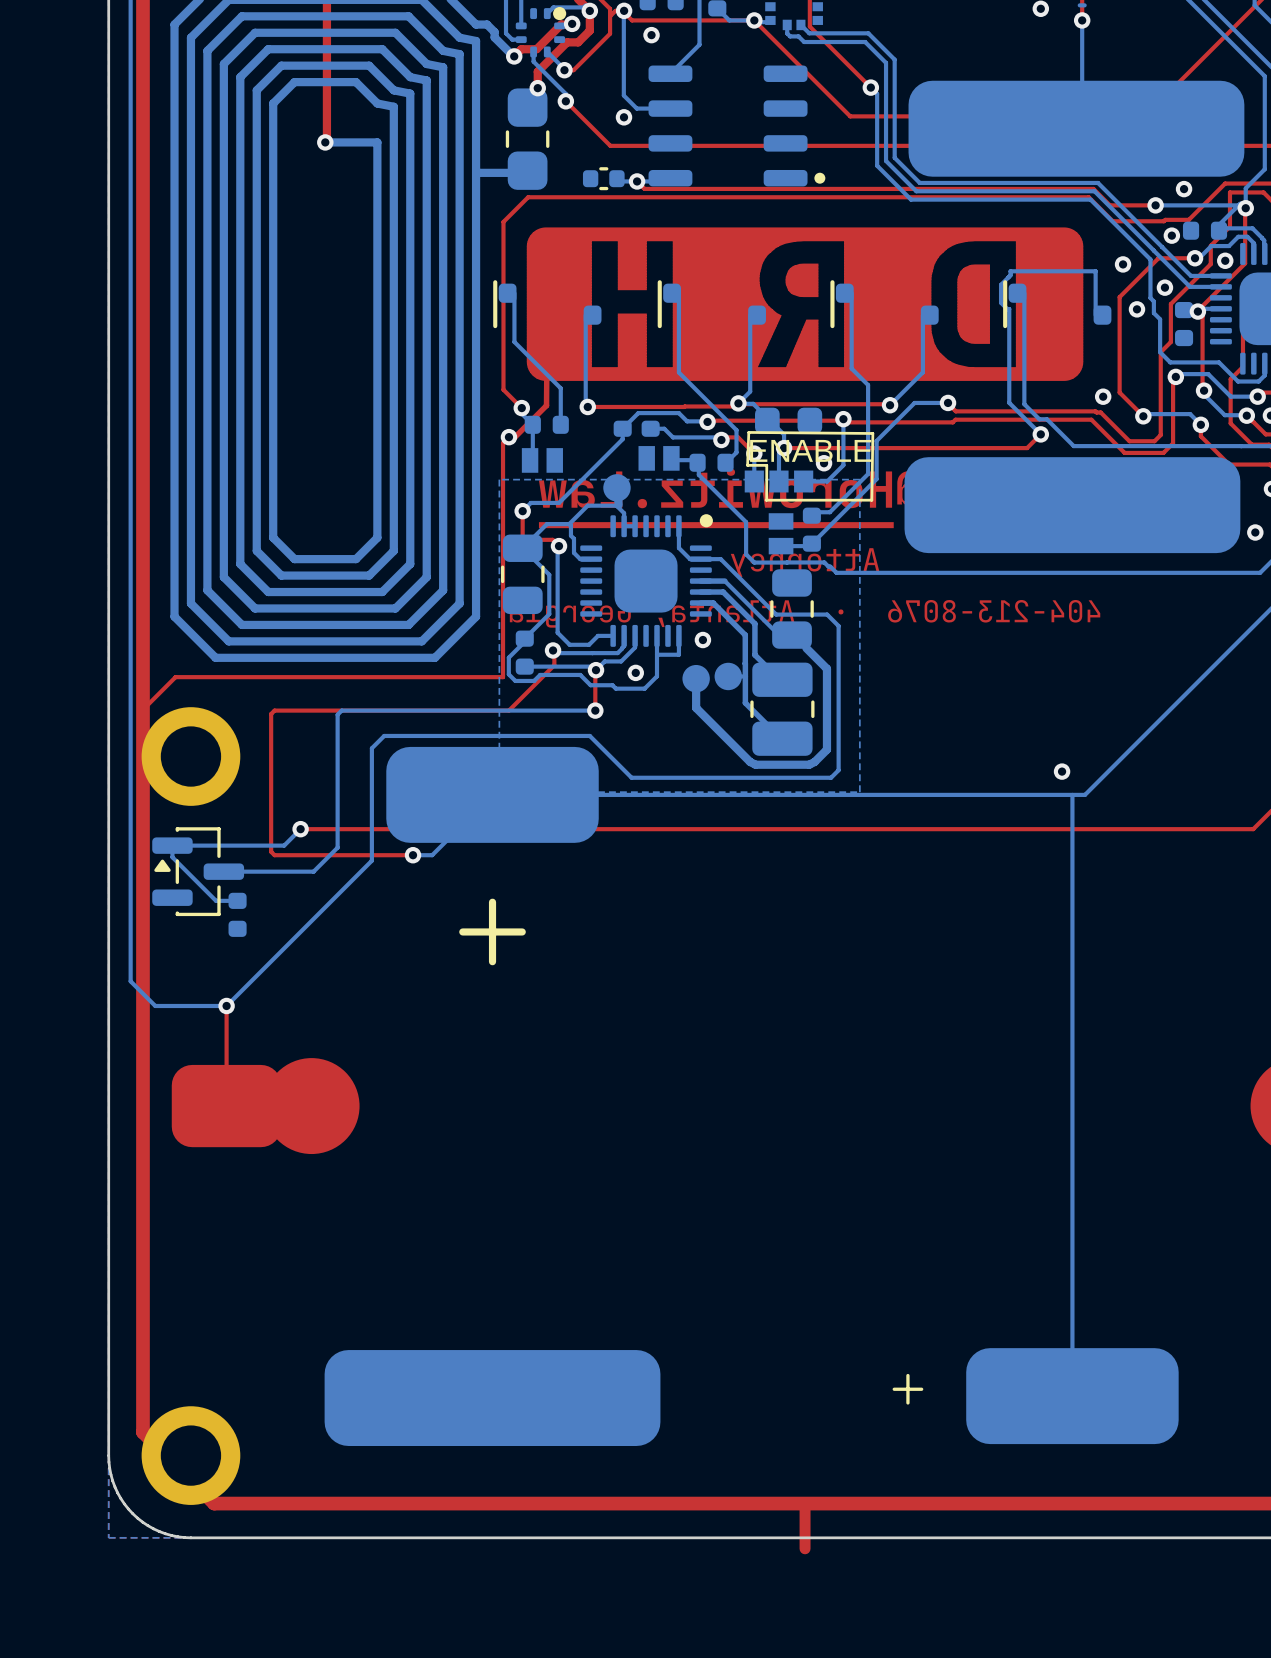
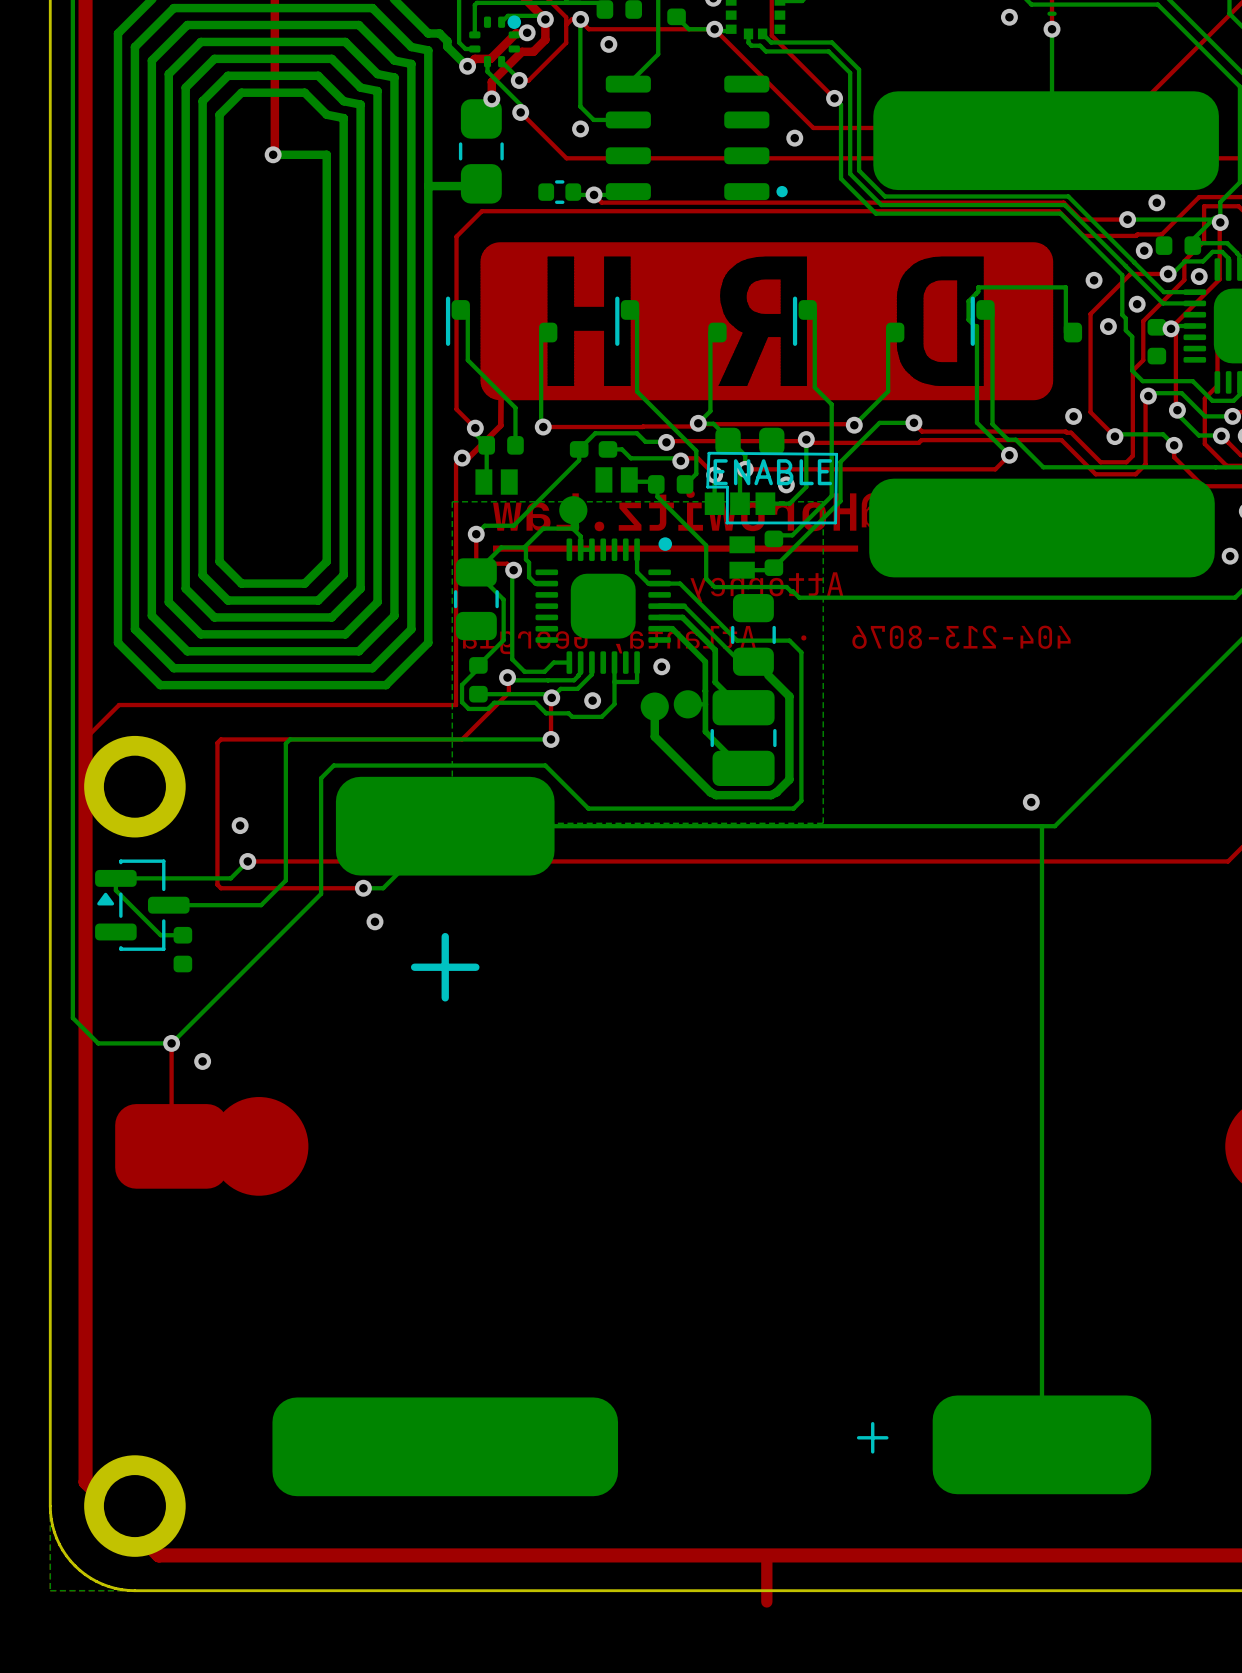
via: none -> (794, 138)
via: none -> (240, 825)
via: none -> (374, 921)
via: none -> (202, 1061)

